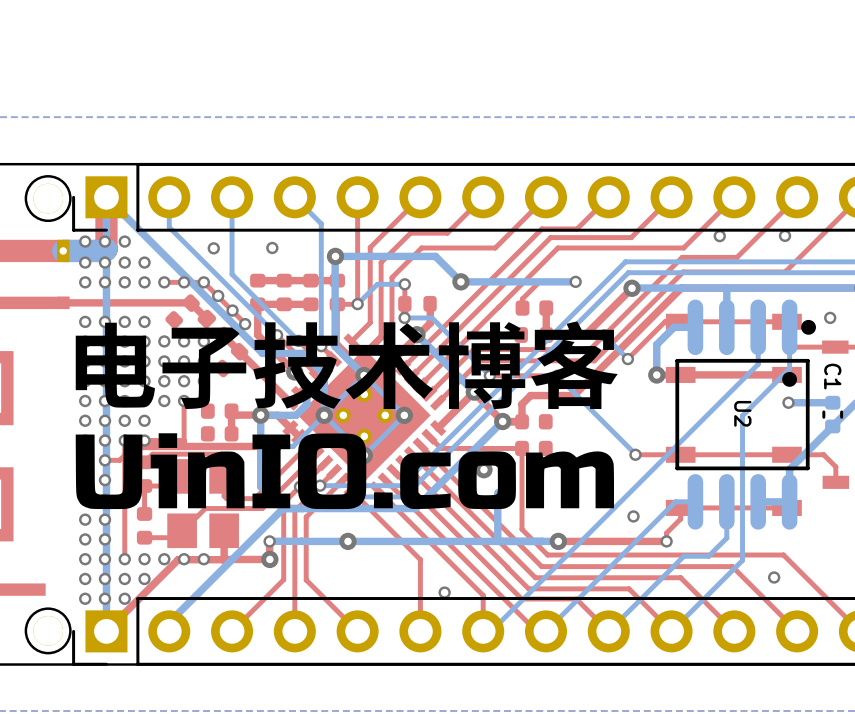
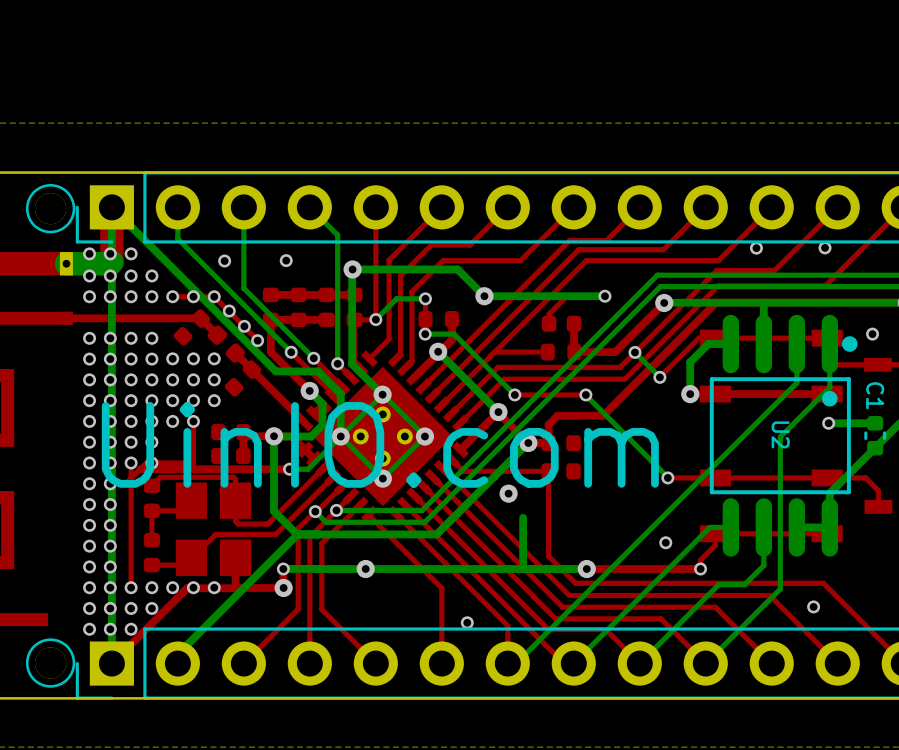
drawing: [75, 321, 618, 510] -> none
text: none -> UinIO.com (380, 444)

